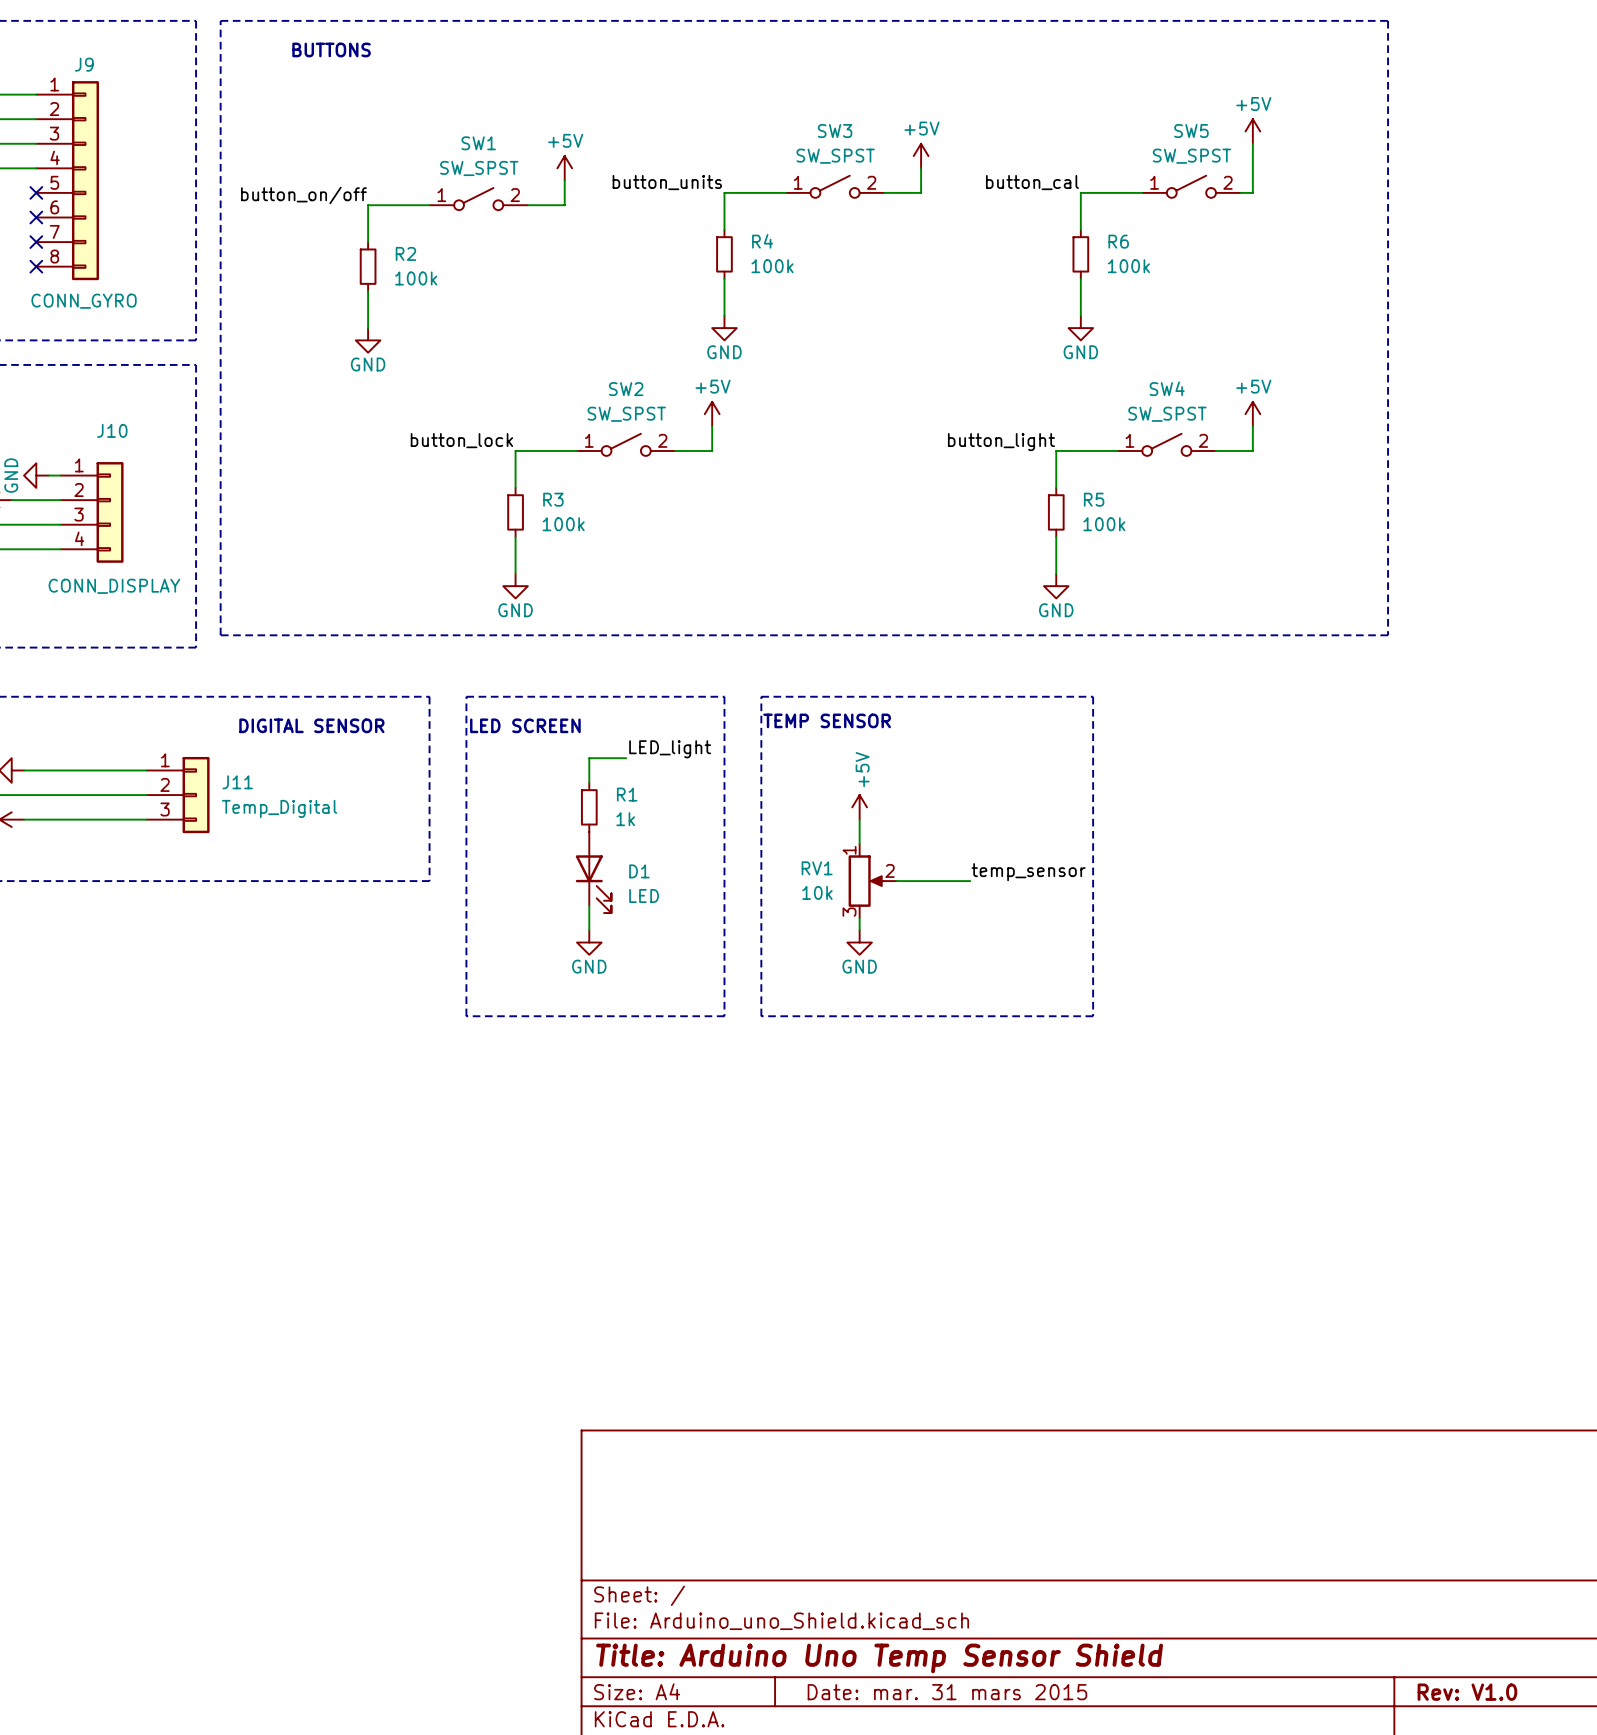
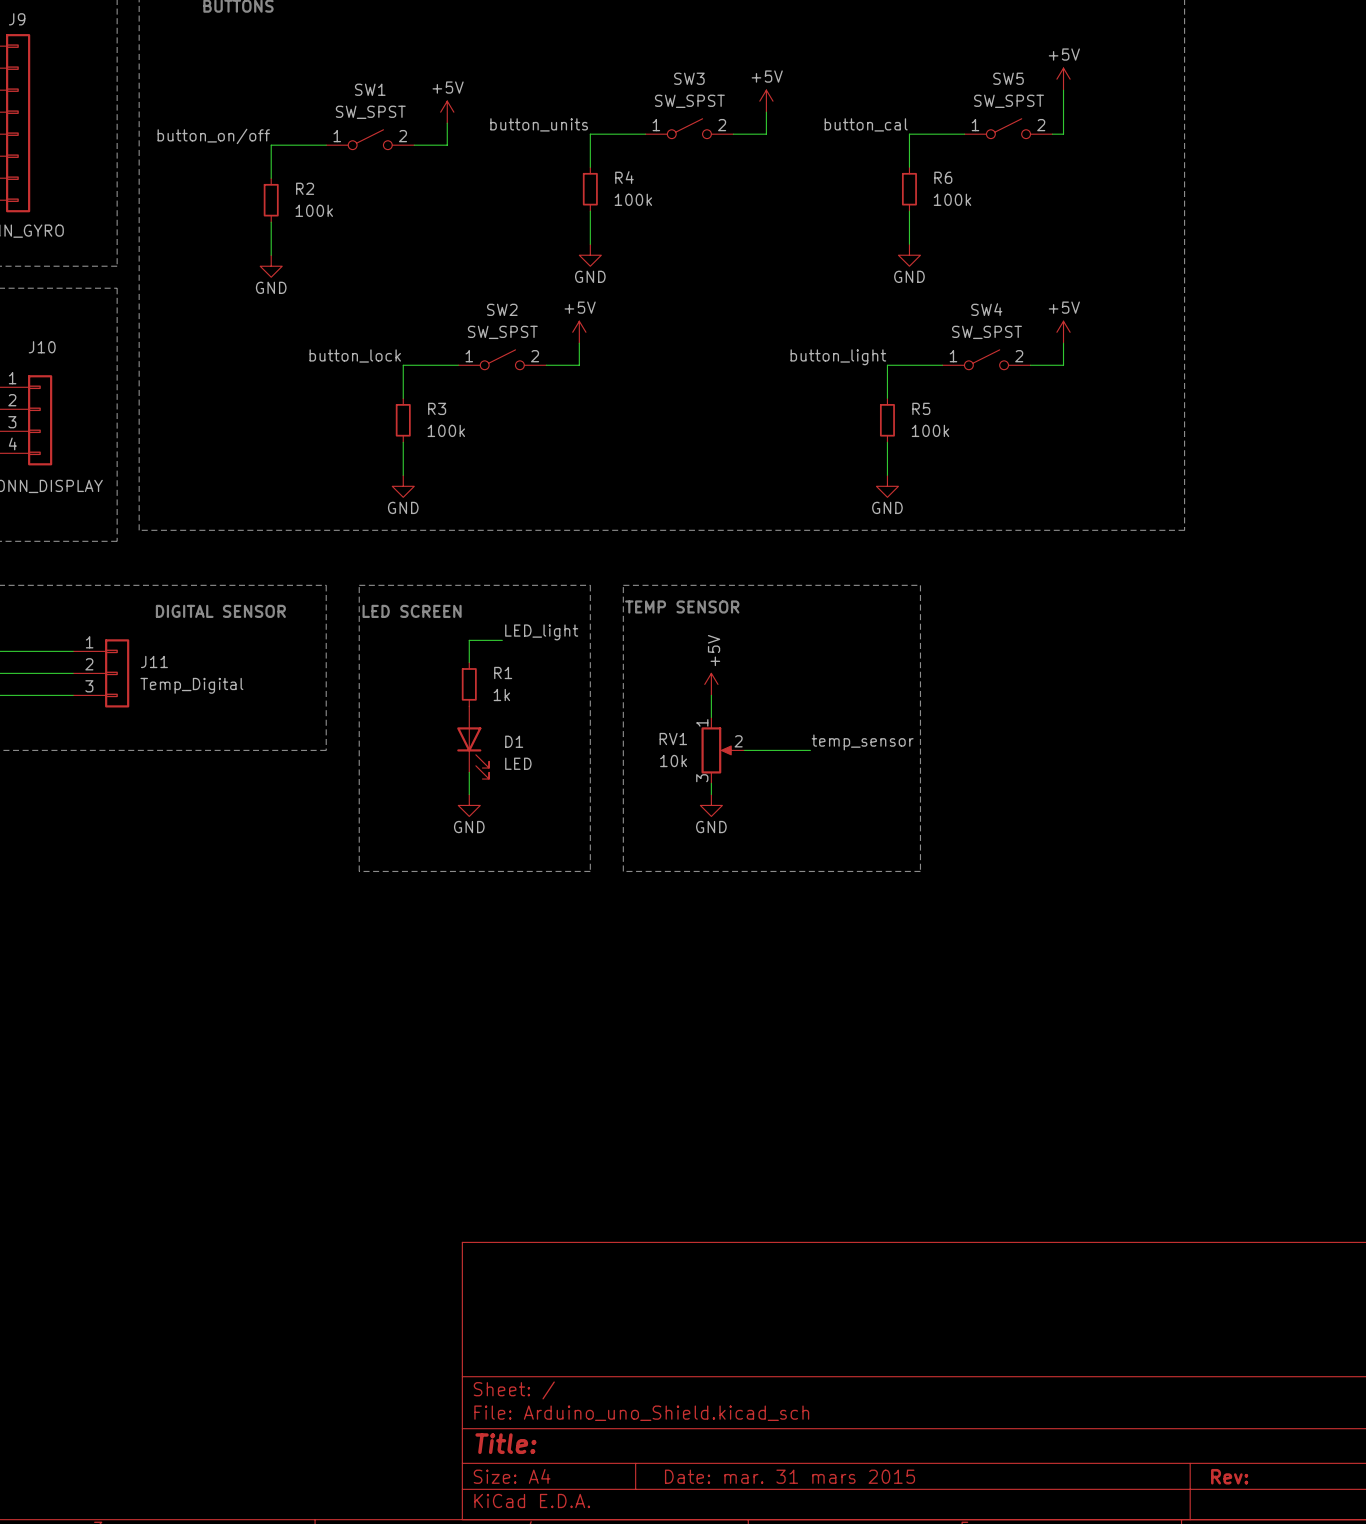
title block: Title: Arduino Uno Temp Sensor Shield (879, 1658) -> Title: (505, 1443)
title block: Rev: V1.0 (1467, 1692) -> Rev: (1229, 1476)

